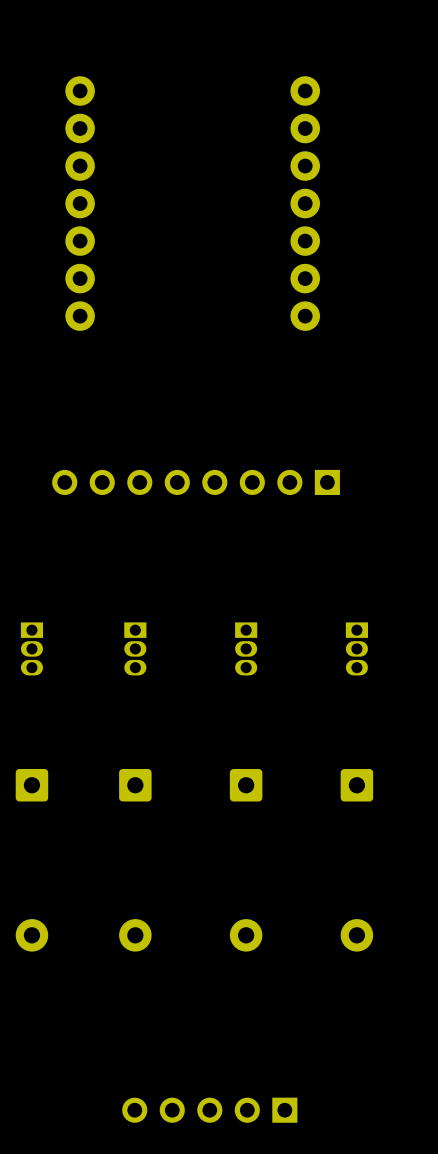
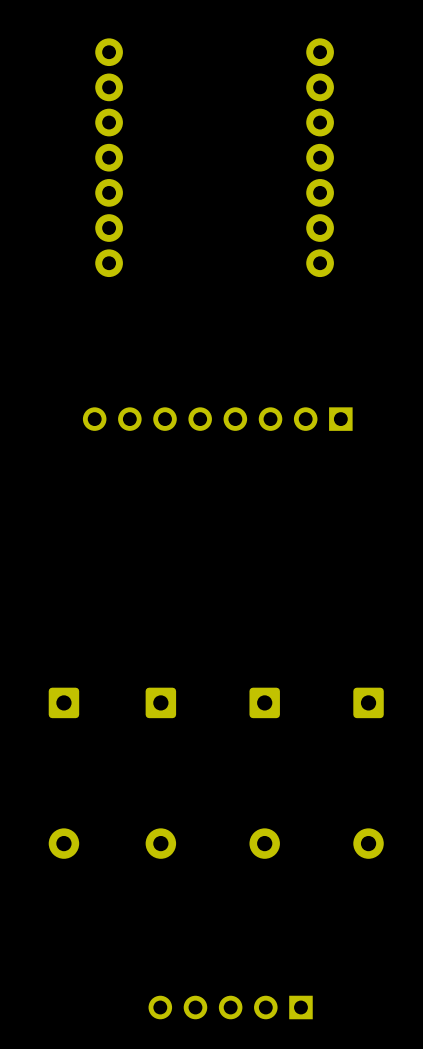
part: (31, 648) -> none
part: (135, 648) -> none
part: (246, 648) -> none
part: (356, 648) -> none

